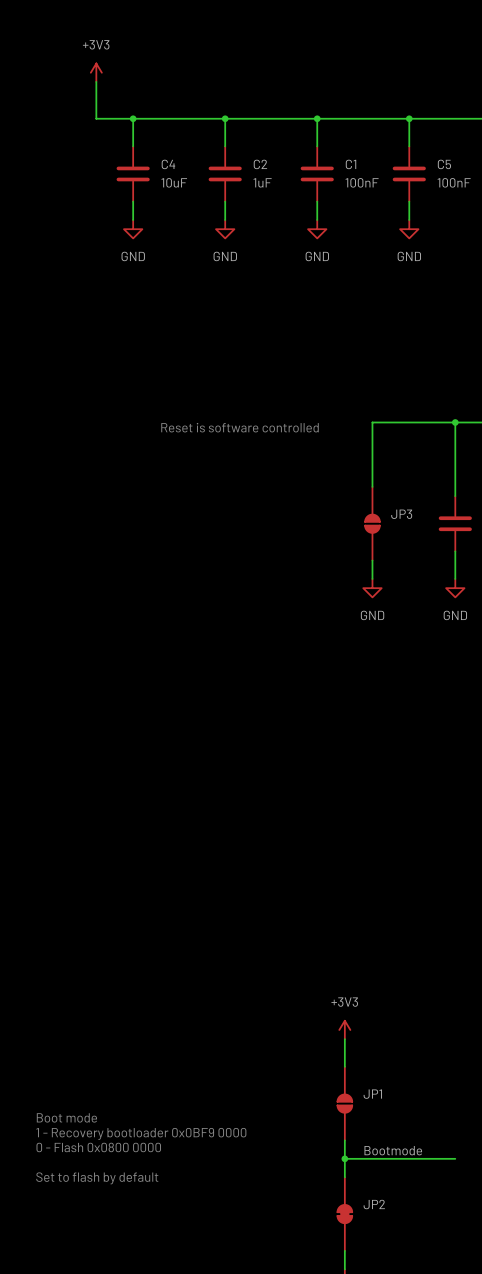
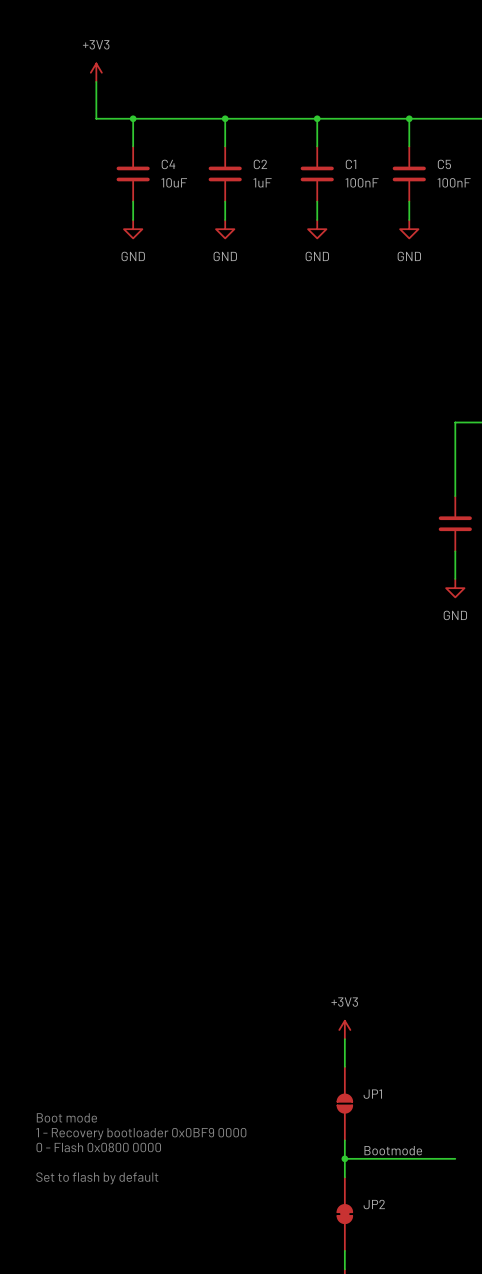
wire: (455, 422) (372, 422) (372, 486) -> none
junction: (455, 422) -> none
text: Reset is software controlled (240, 427) -> none
JP3: (372, 523) -> none
wire: (372, 560) (372, 578) -> none
power symbol: GND (372, 588) -> none

